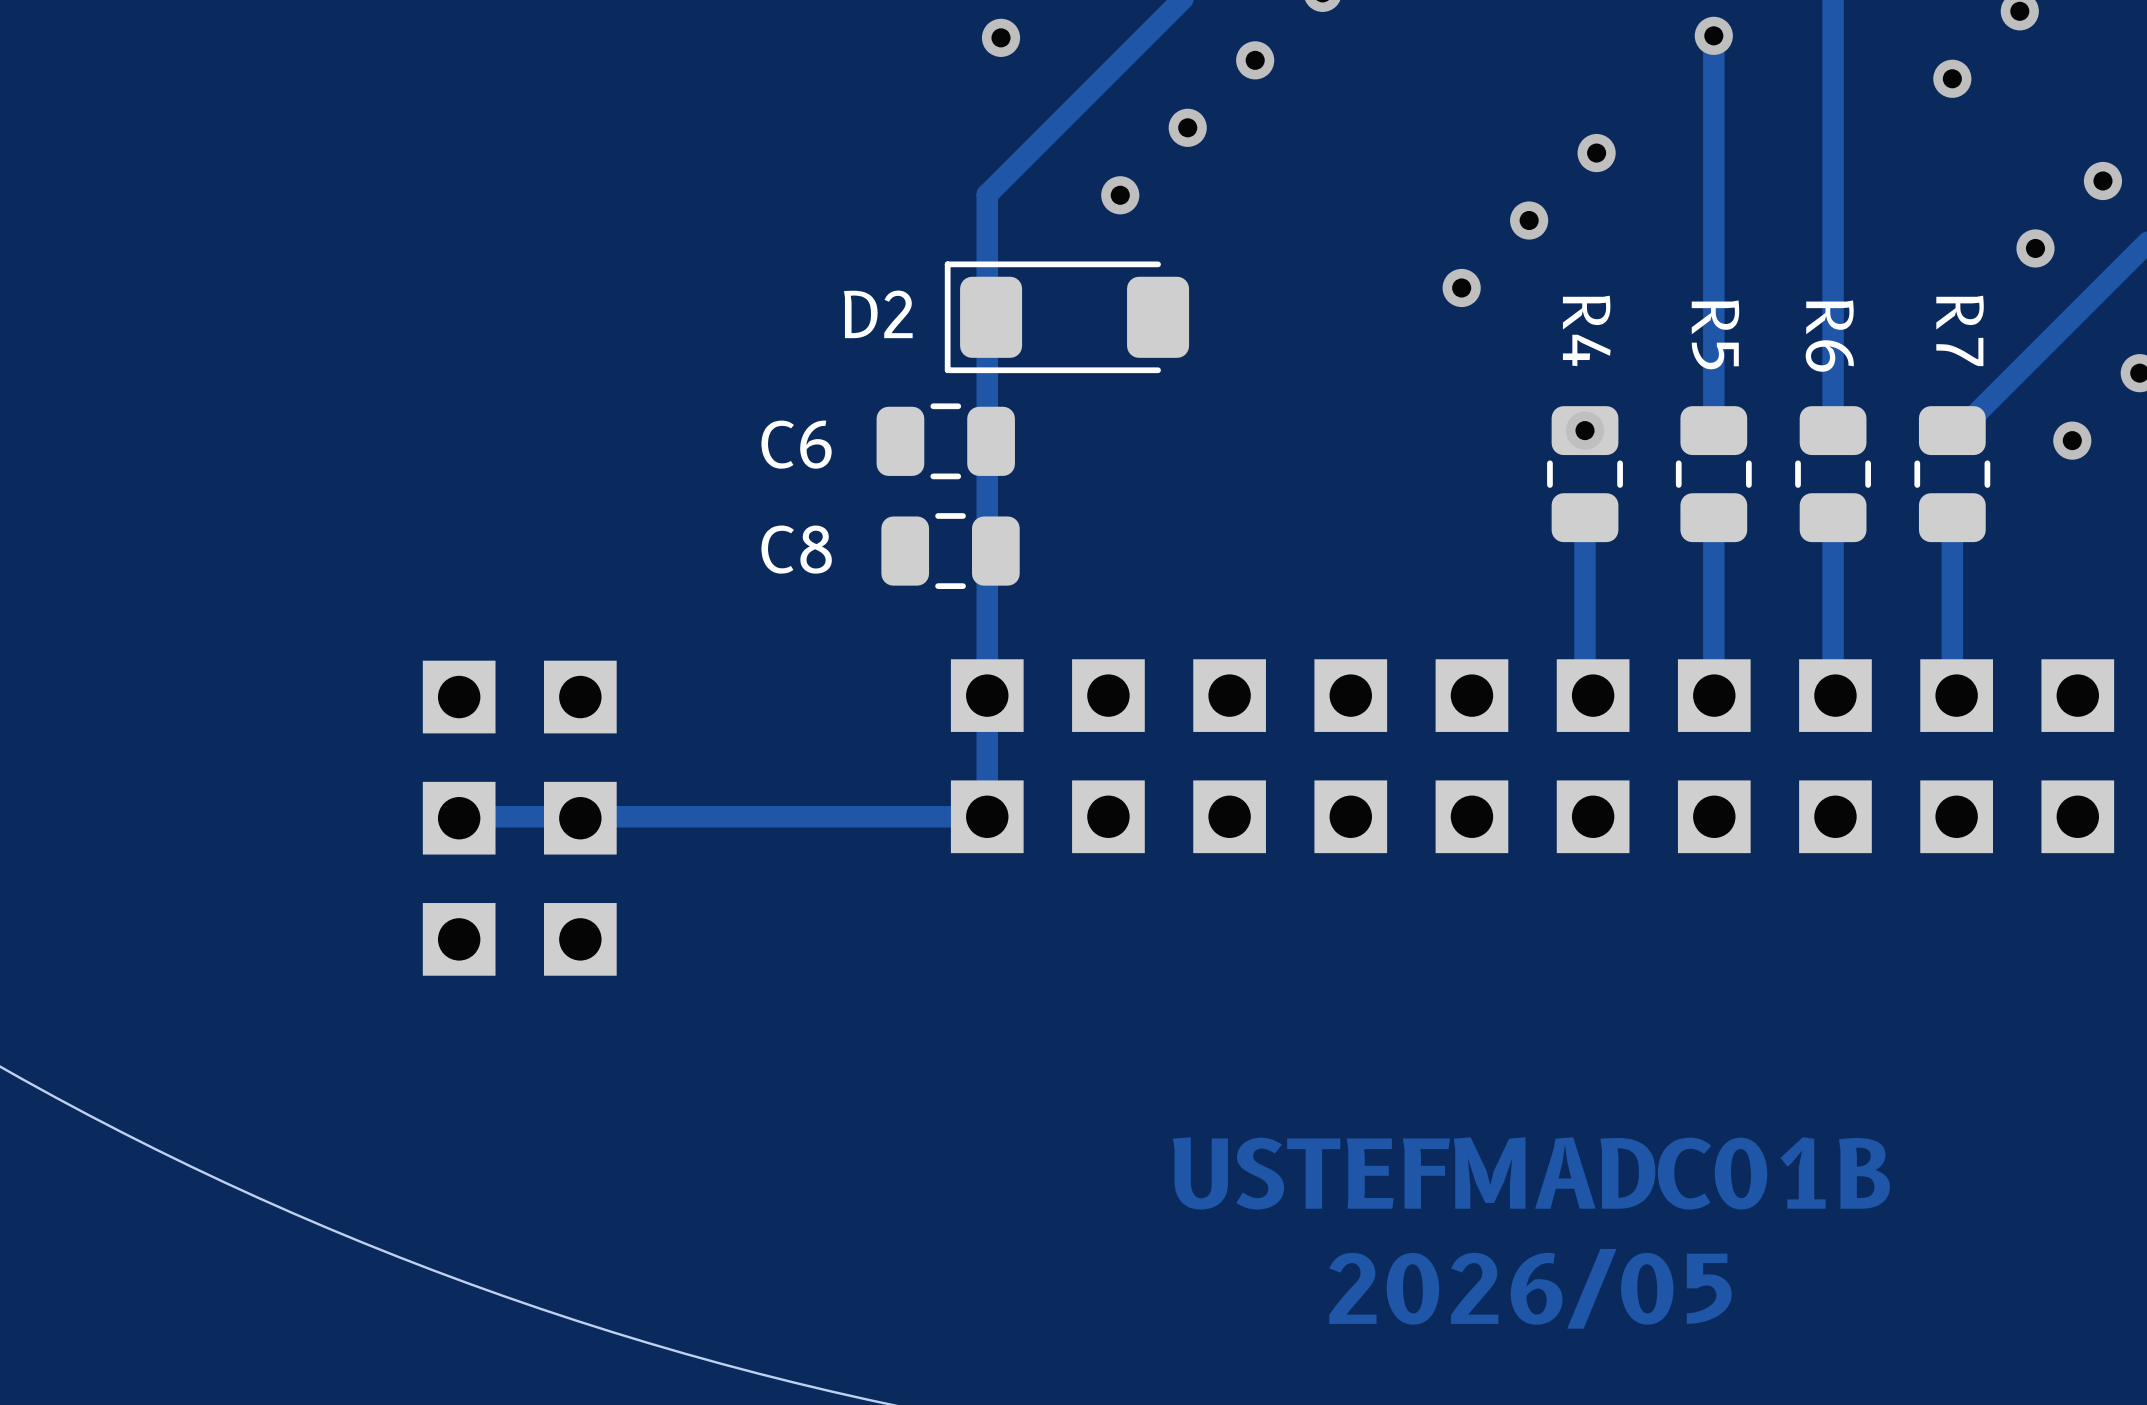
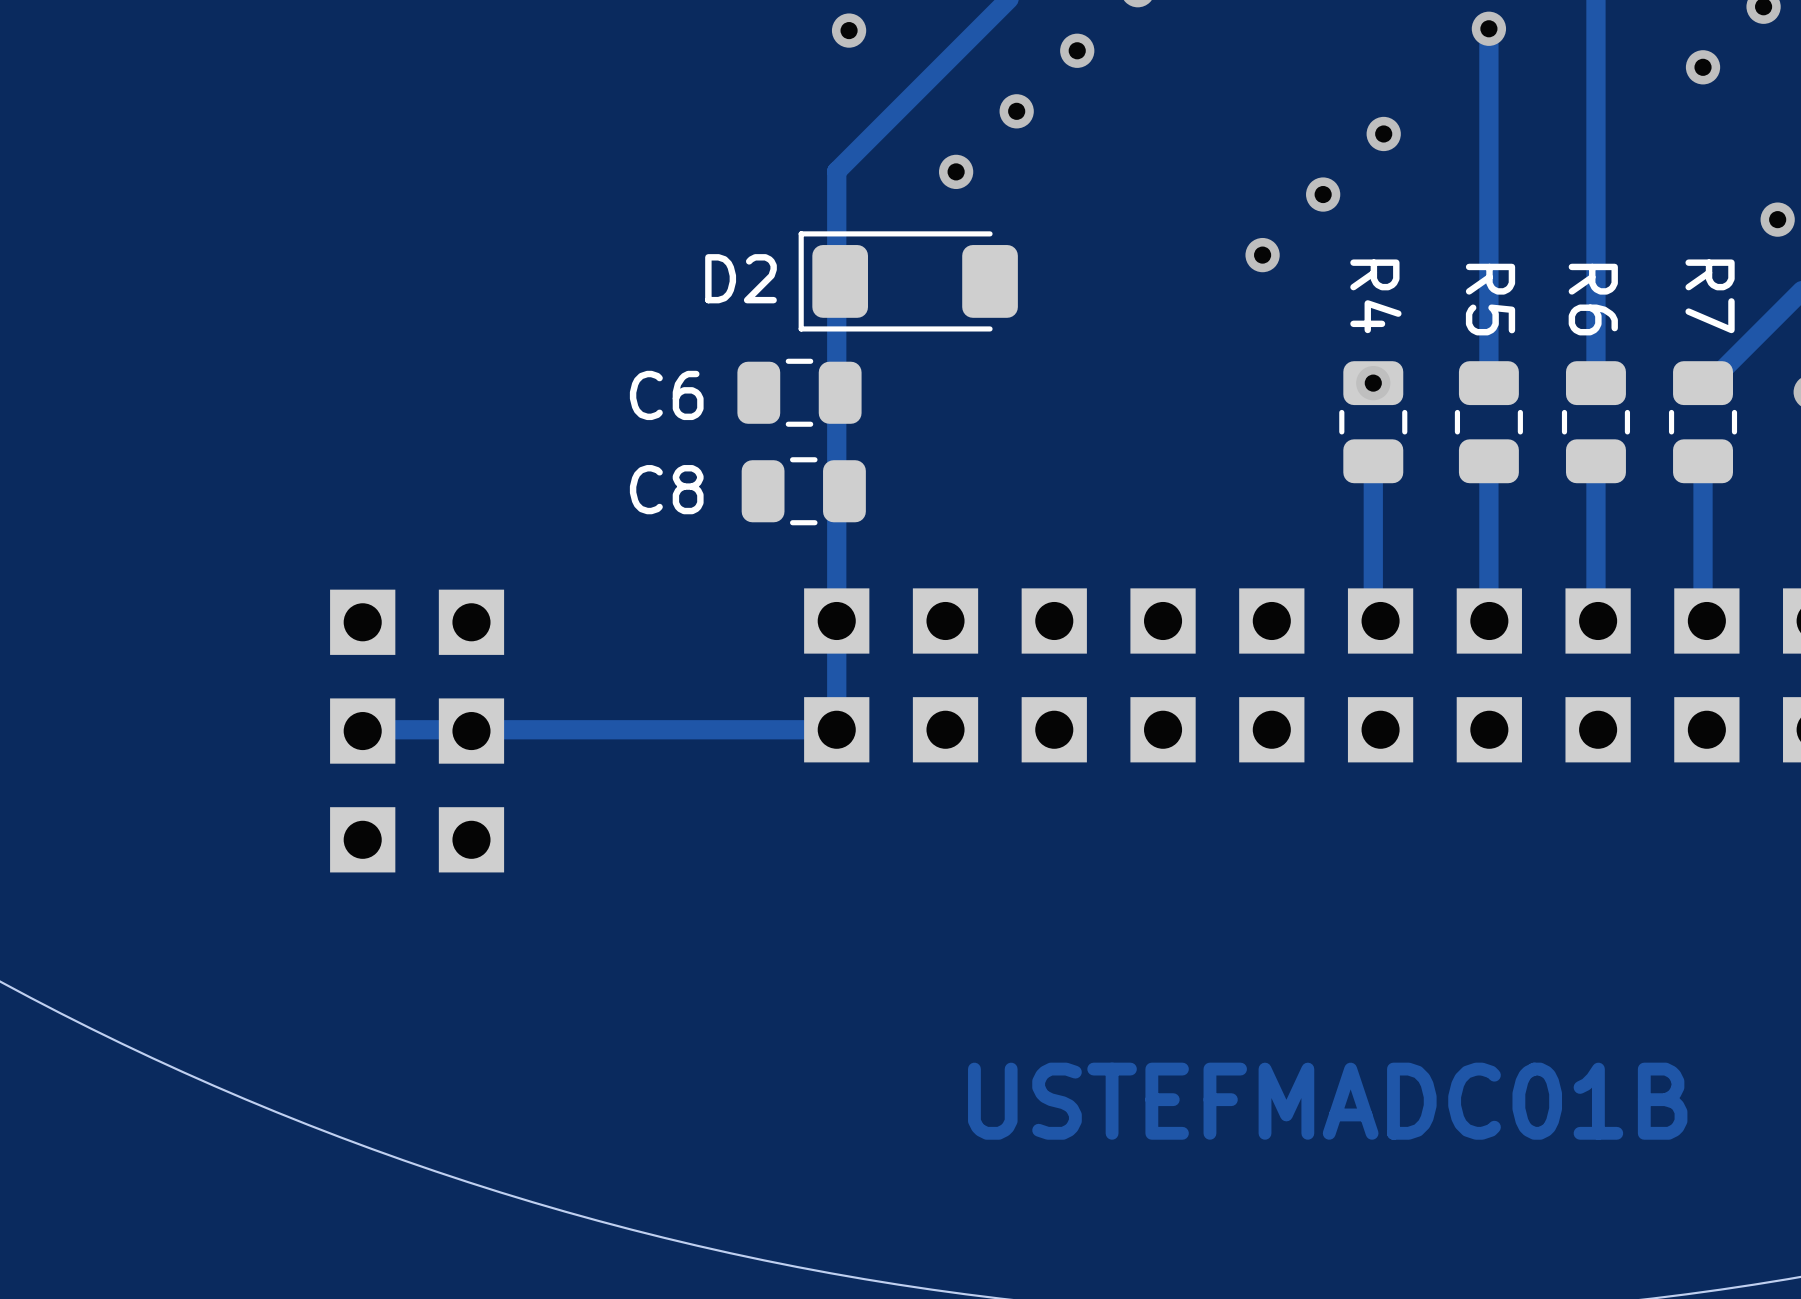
text position: USTEFMADC01B (1531, 1173) -> USTEFMADC01B (1327, 1101)
text: 2026/05 (1530, 1288) -> none

